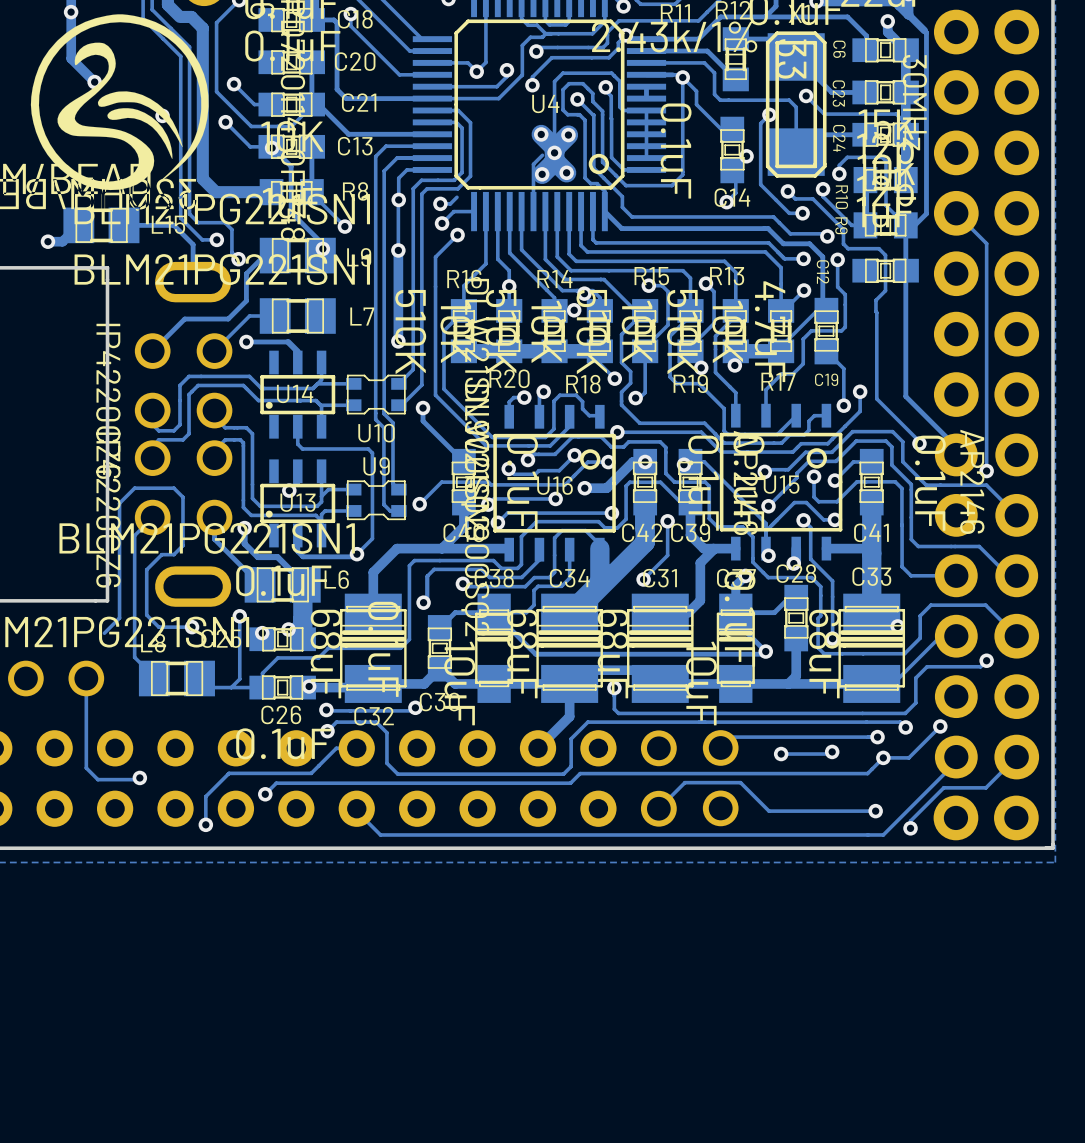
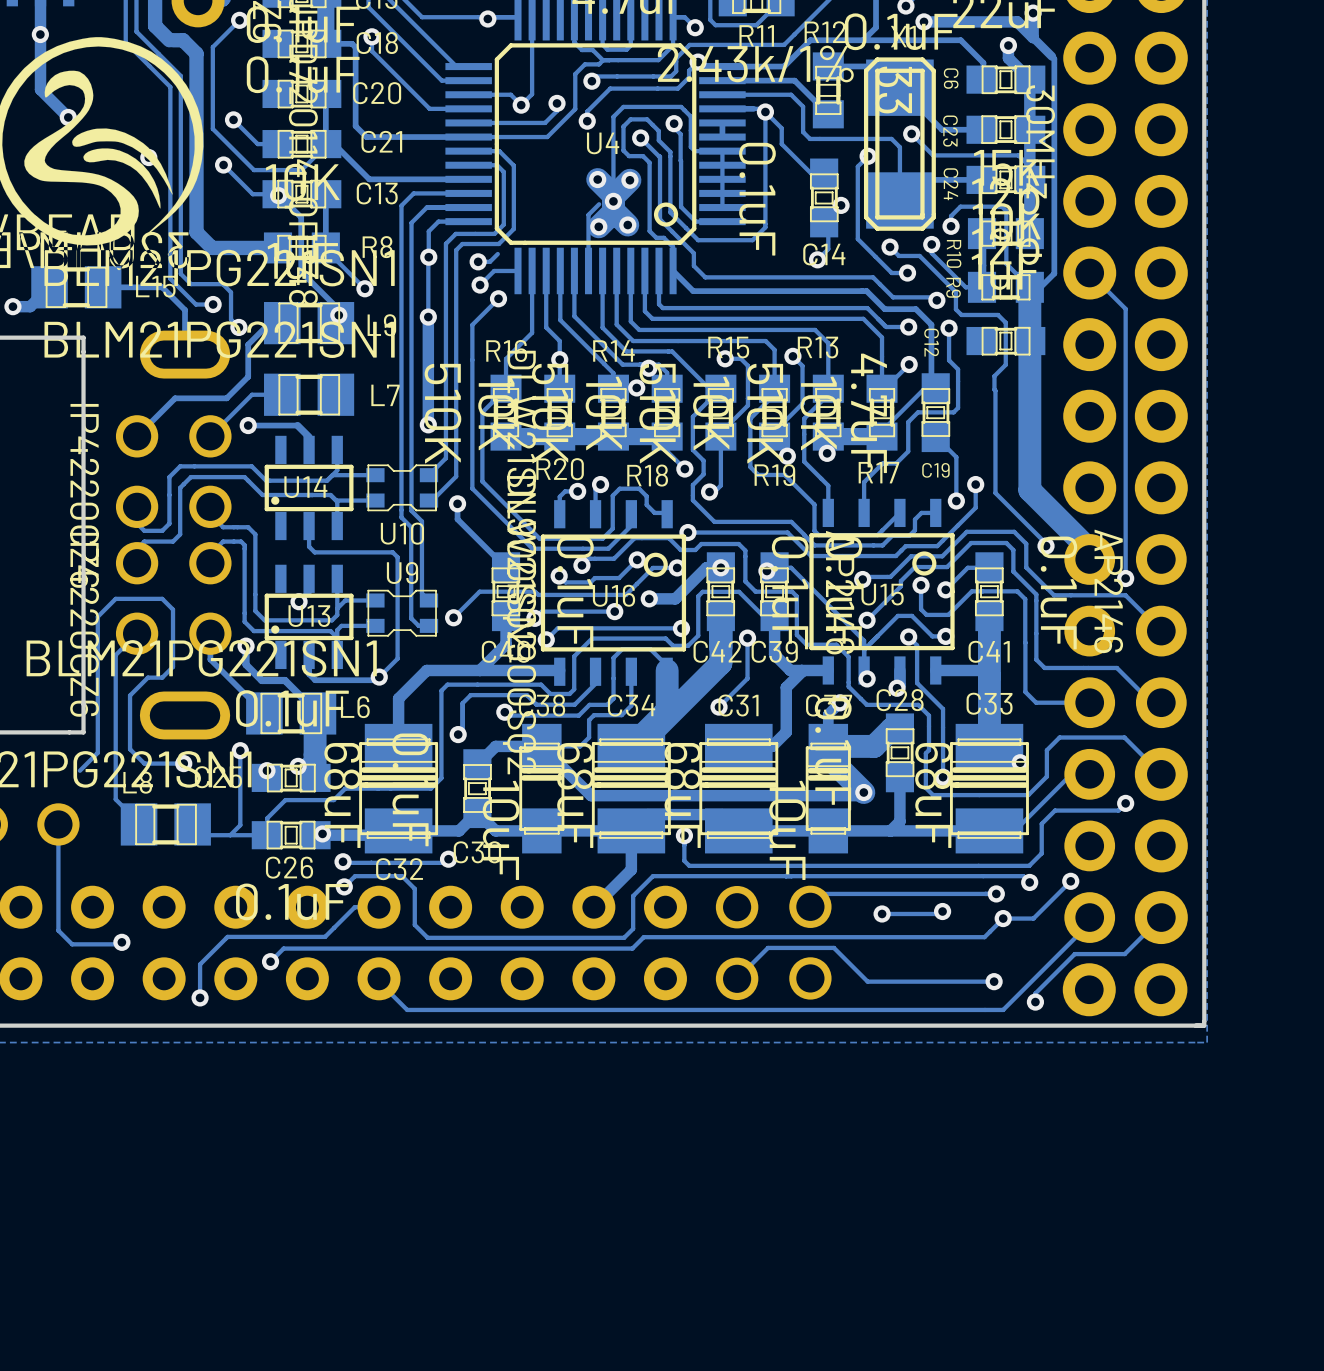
track width: thin (905, 225) (905, 396) (956, 446) (956, 454) -> thick (1029, 287) (1029, 490) (1089, 550) (1089, 559)
track width: thin (796, 597) (789, 597) (774, 612) (735, 612) -> thick (899, 728) (891, 728) (874, 746) (828, 746)
track width: thin (735, 621) (765, 651) (763, 654) (535, 654) (494, 612) (455, 612) (439, 628) -> thick (828, 756) (863, 792) (860, 795) (591, 795) (541, 746) (495, 746) (477, 764)

